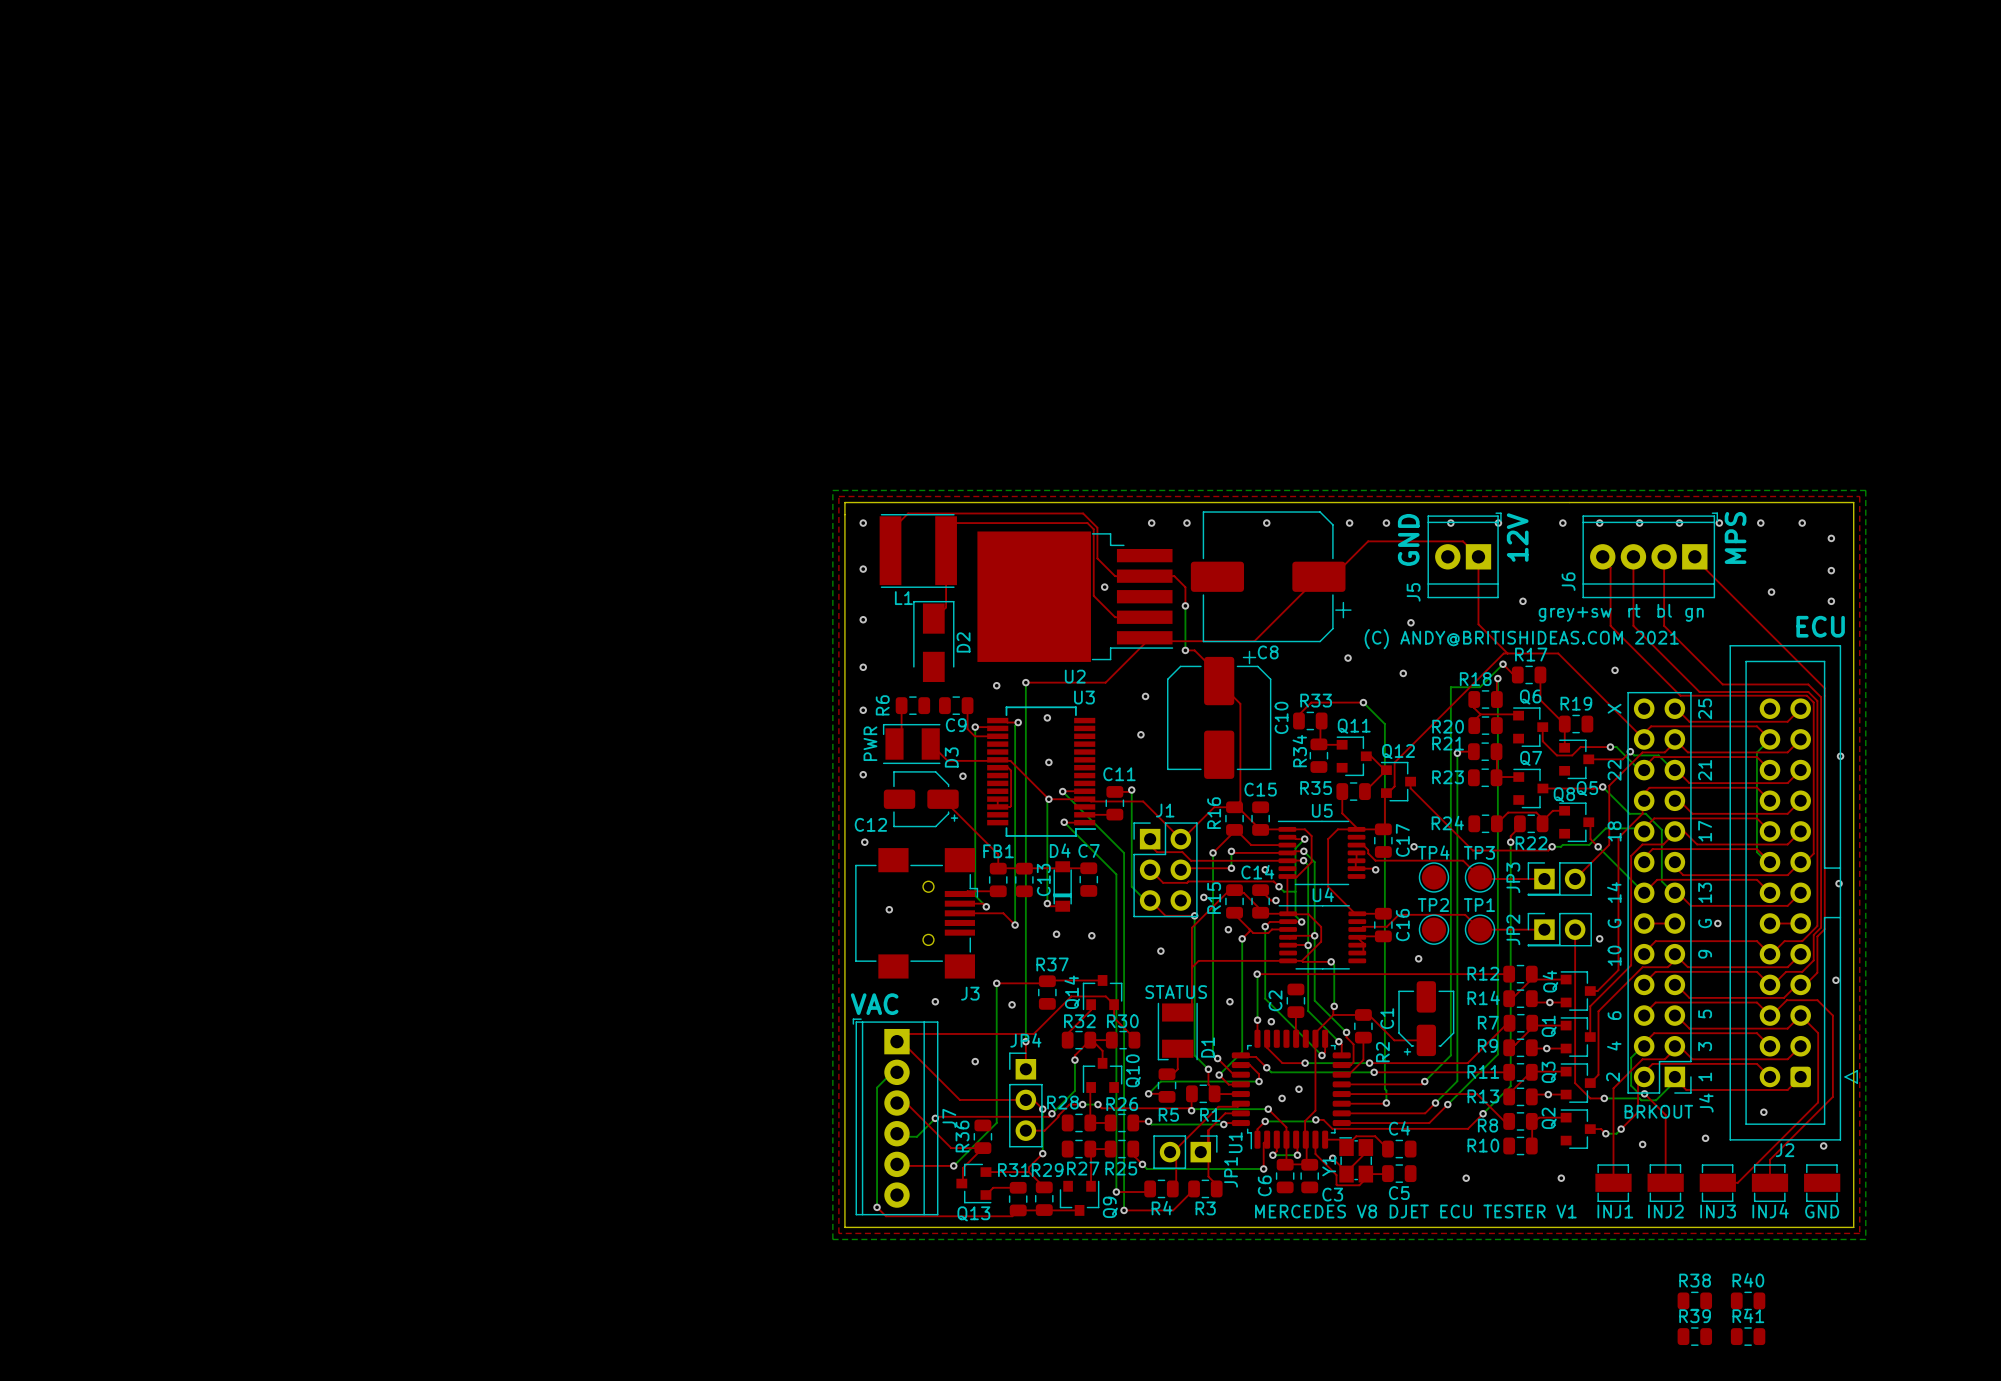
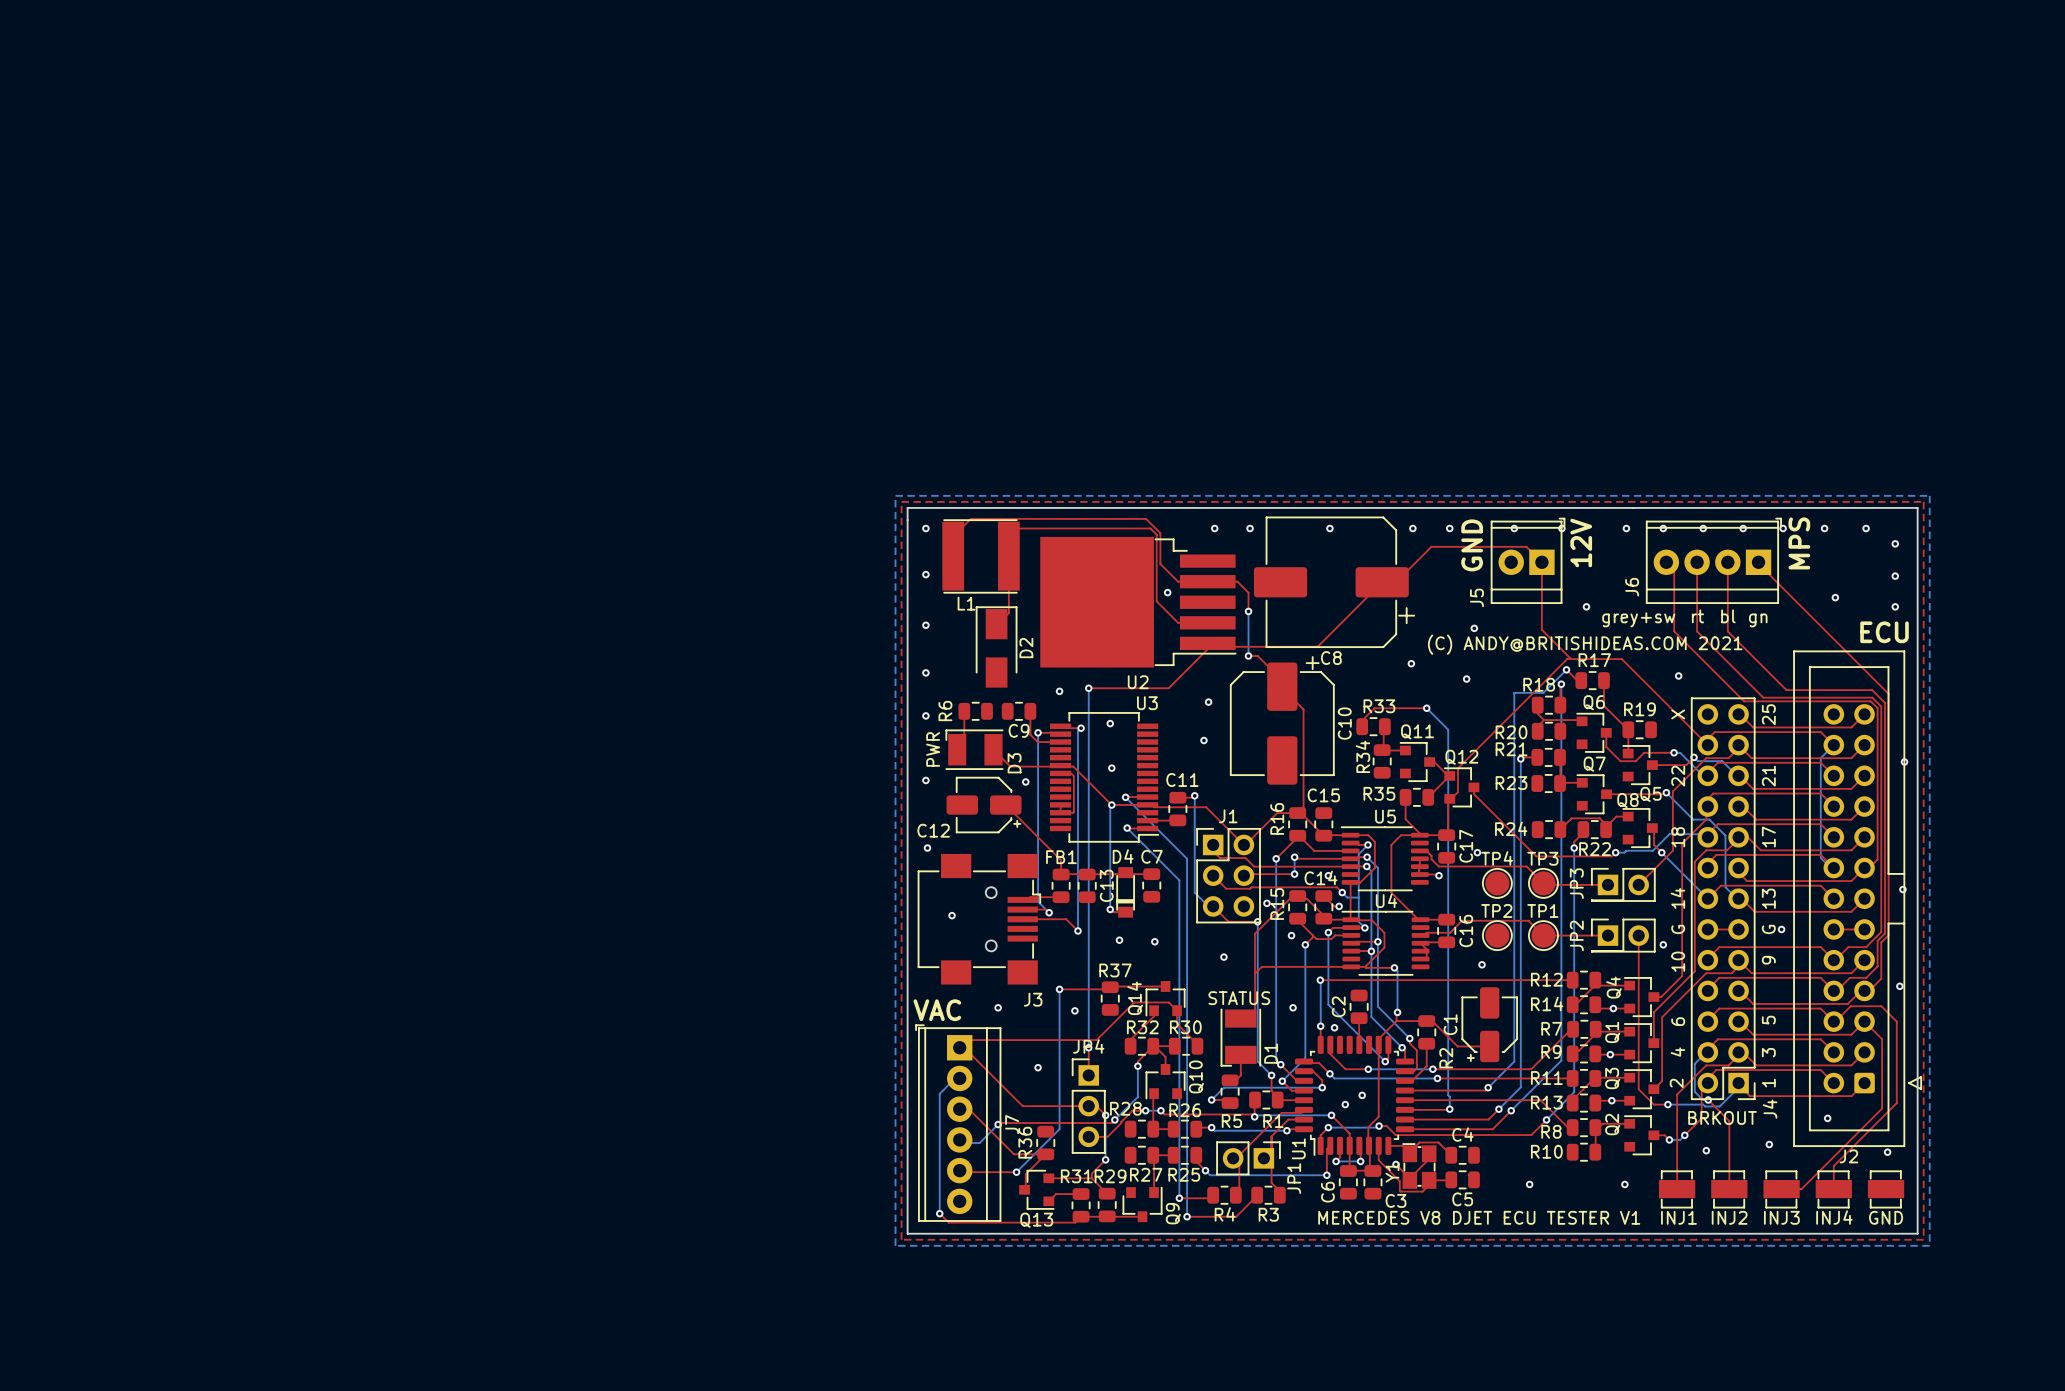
R38: (1694, 1300) -> none
R40: (1748, 1300) -> none
R39: (1694, 1336) -> none
R41: (1748, 1336) -> none

